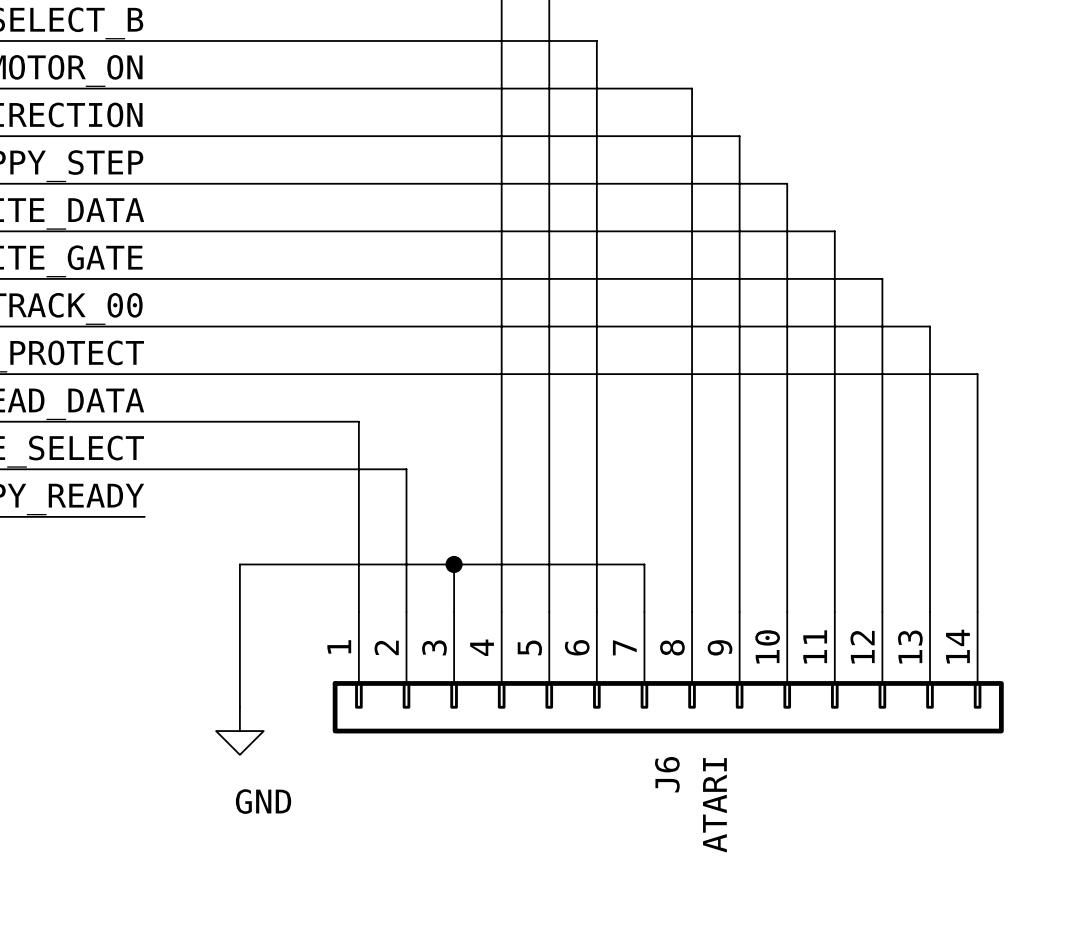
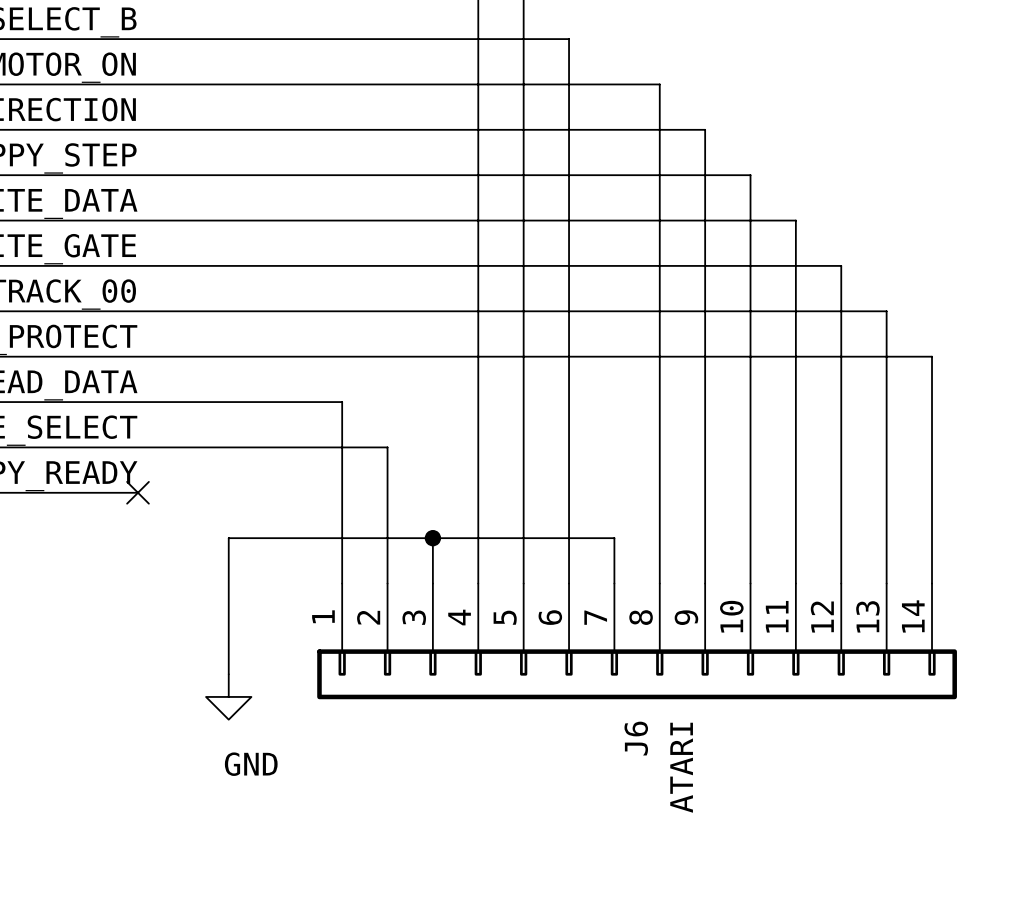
no-connect mark: none -> (138, 492)

